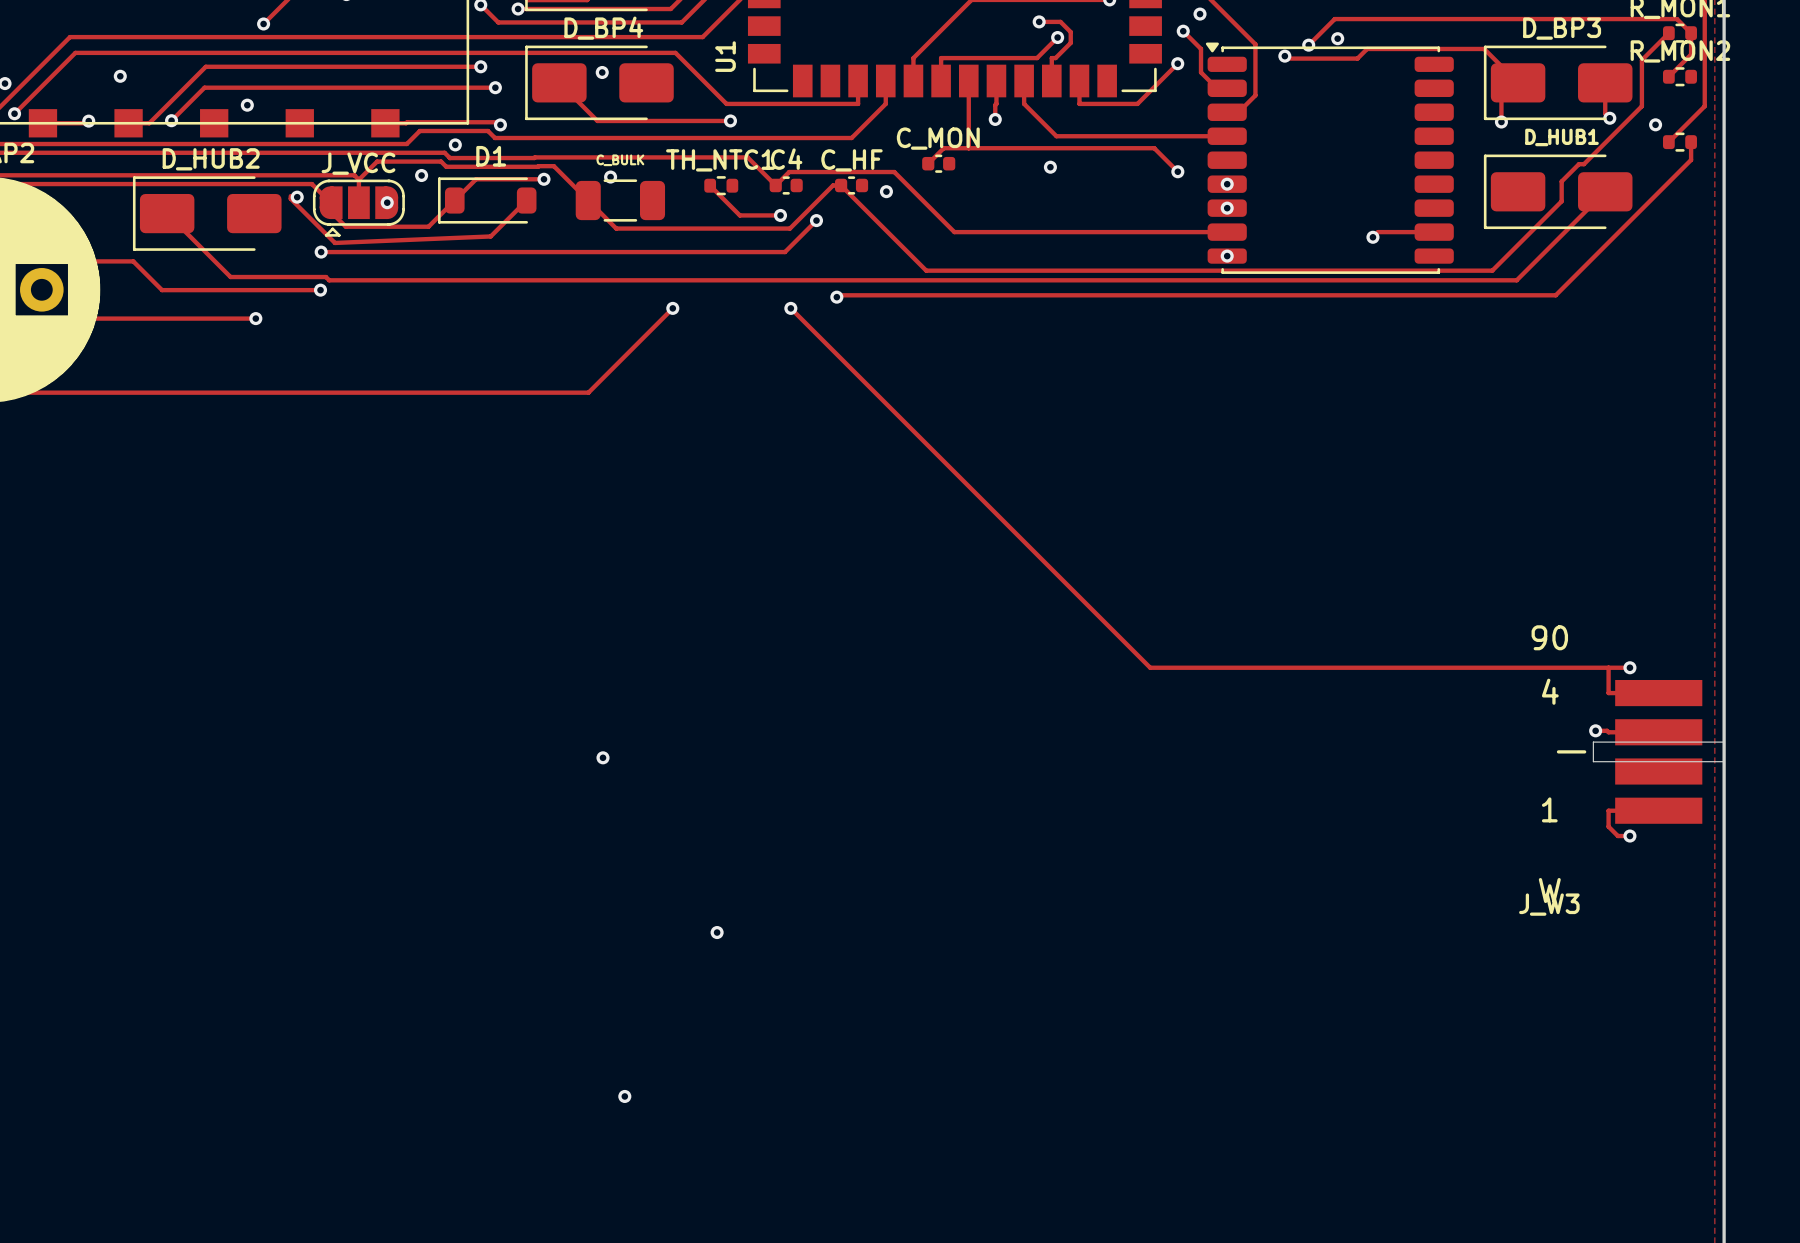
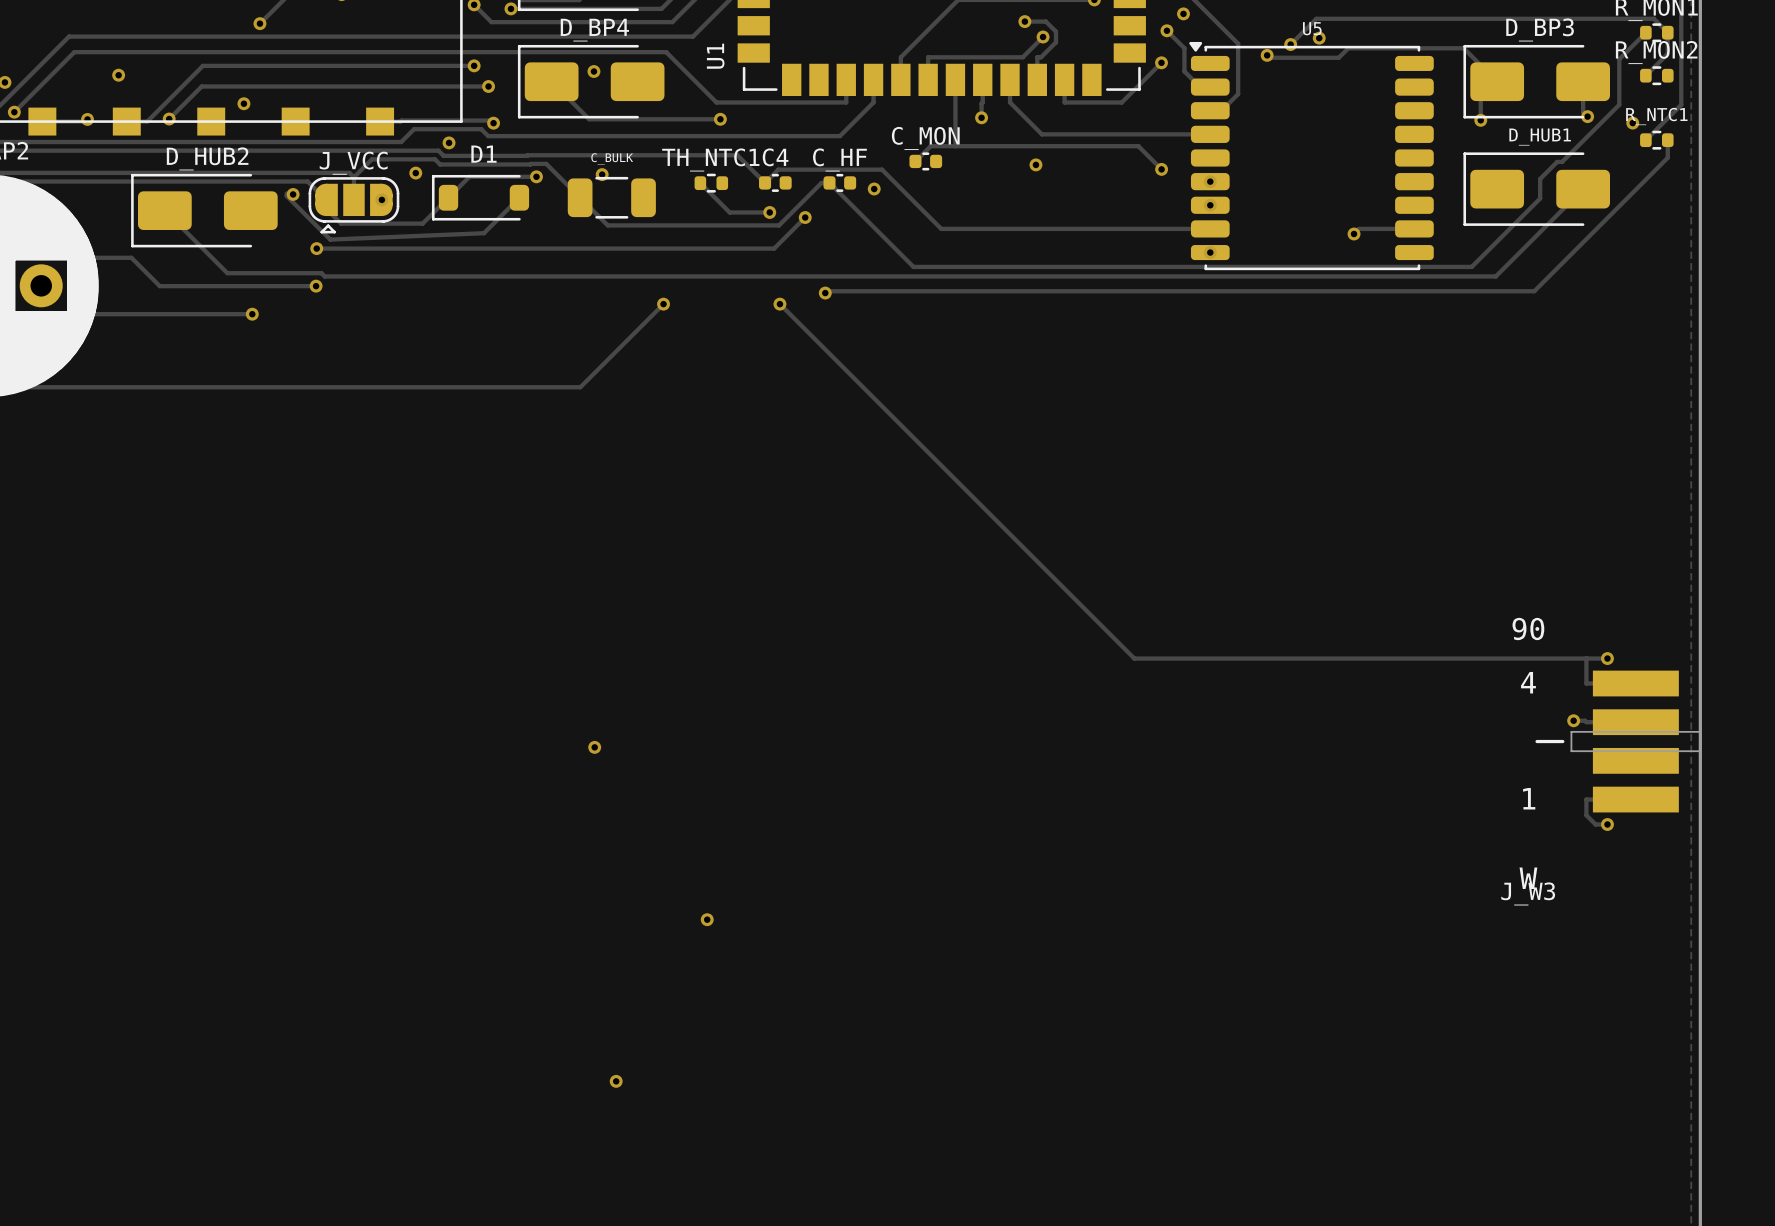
U5 name: none -> U5 (1312, 28)
R_NTC1 name: none -> R_NTC1 (1656, 116)

